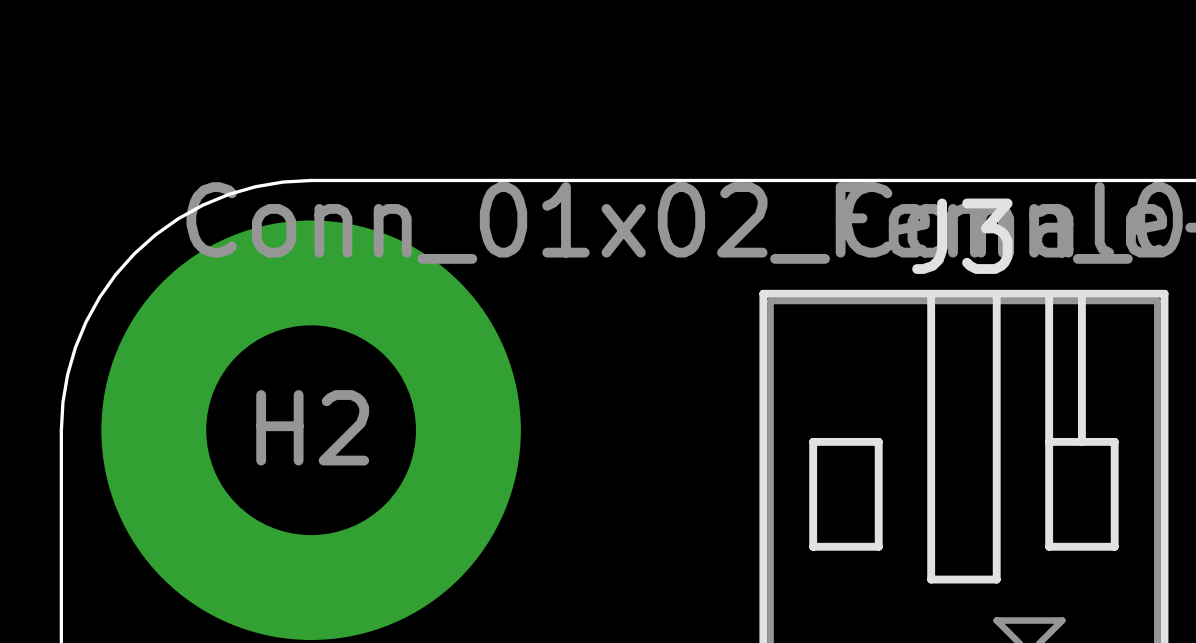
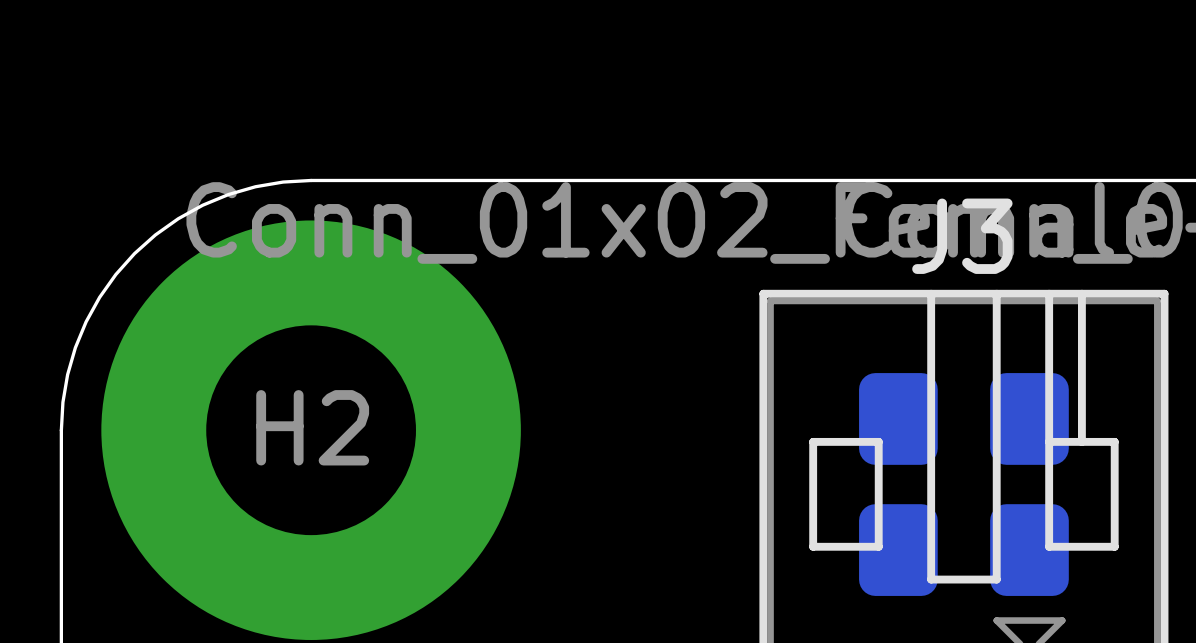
part: none -> (963, 418)
part: none -> (963, 550)

